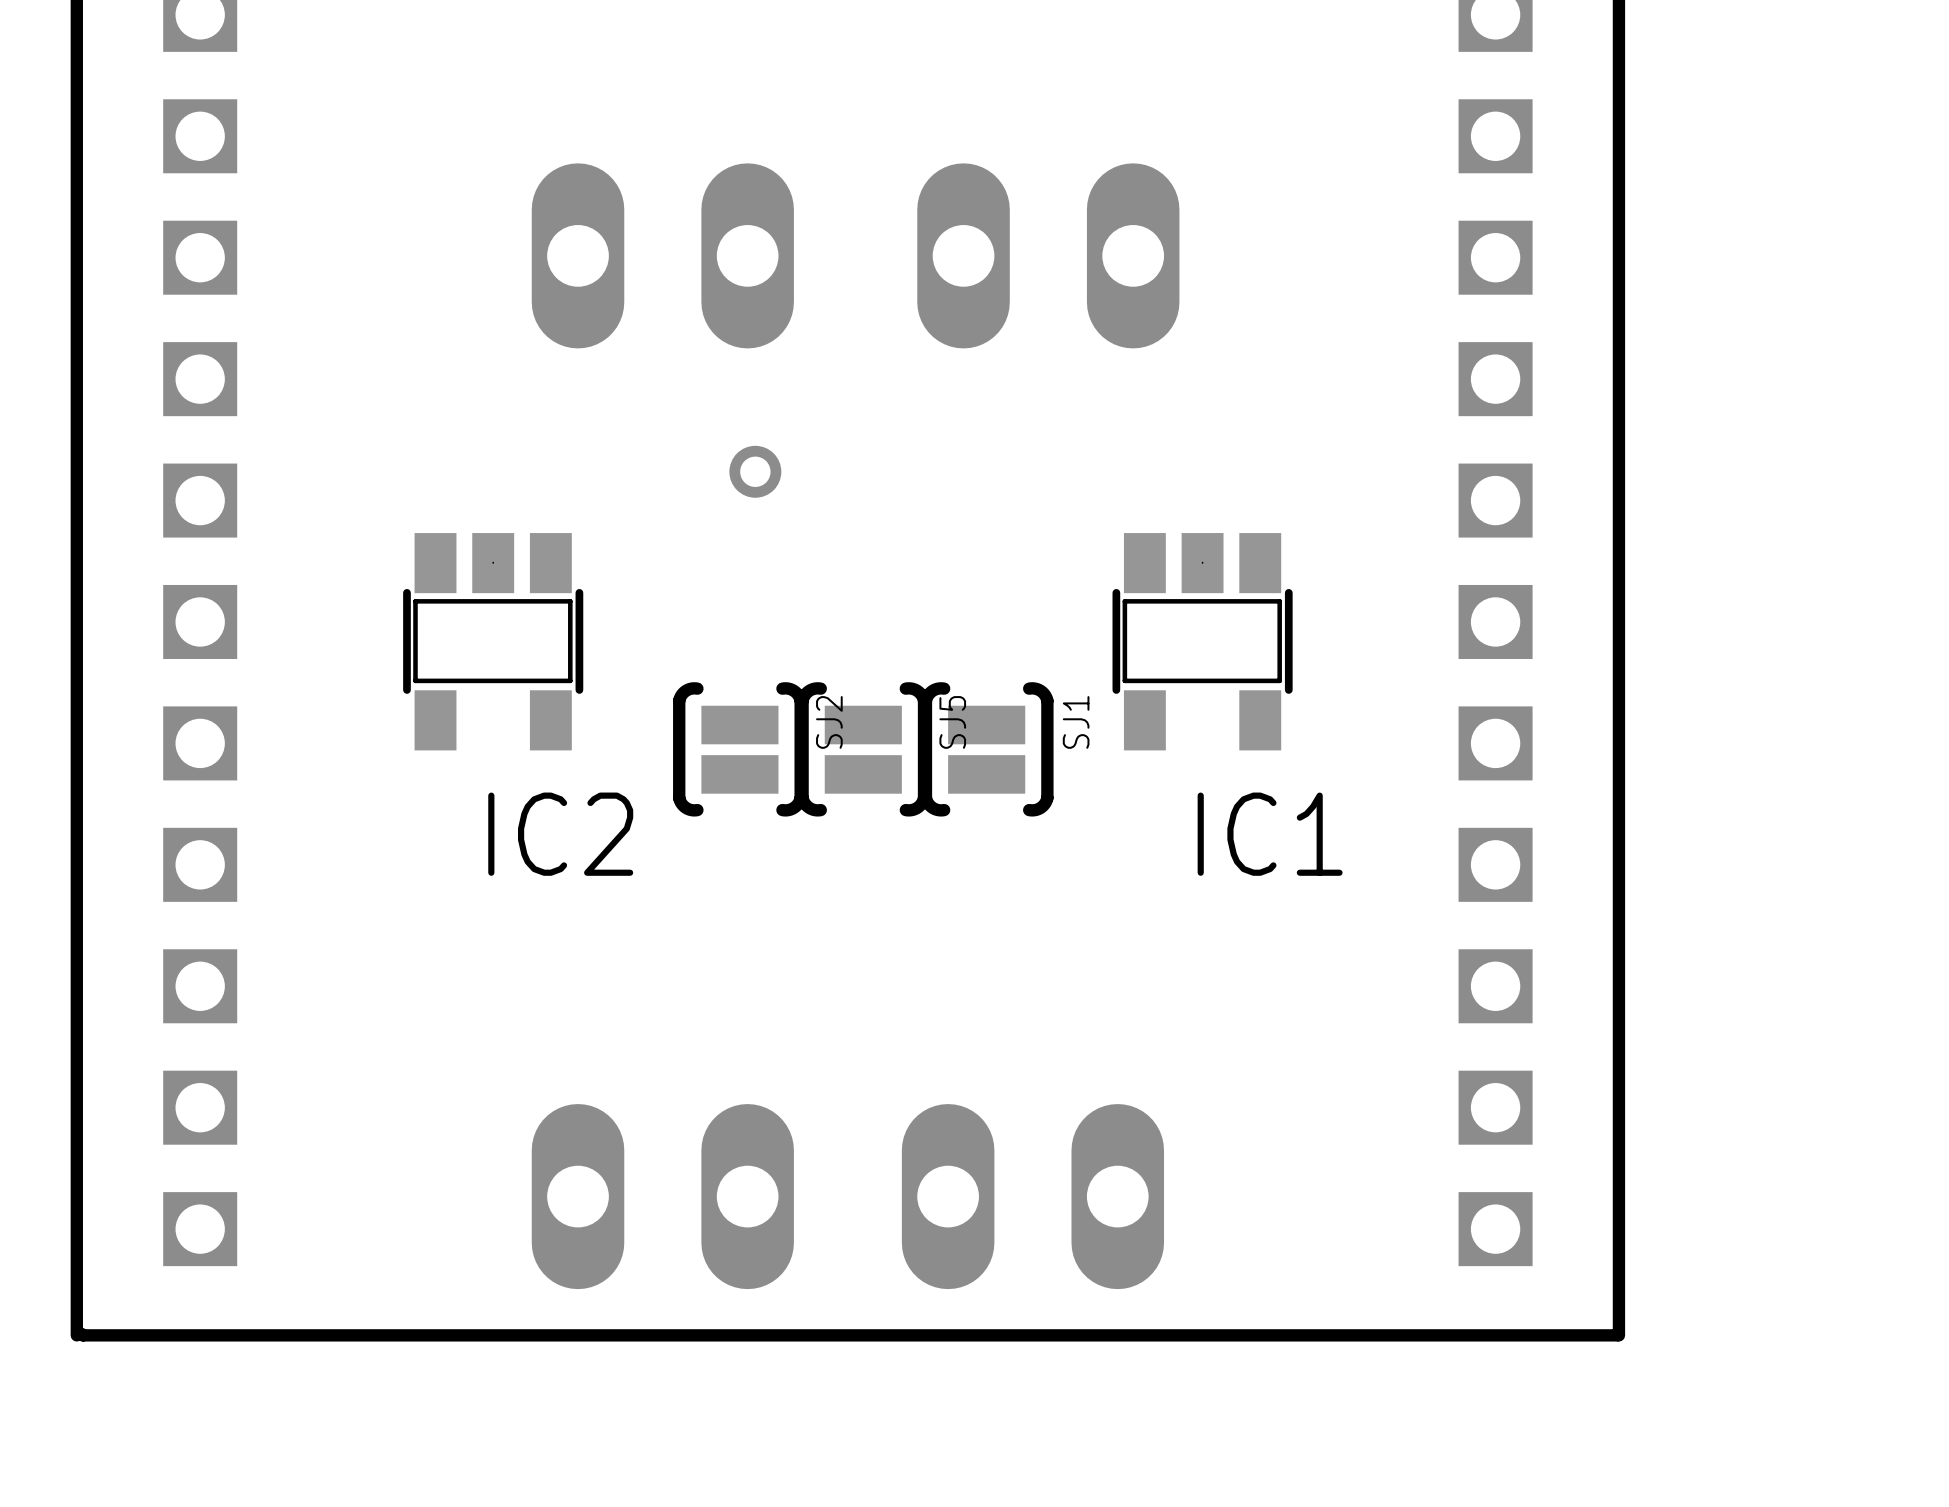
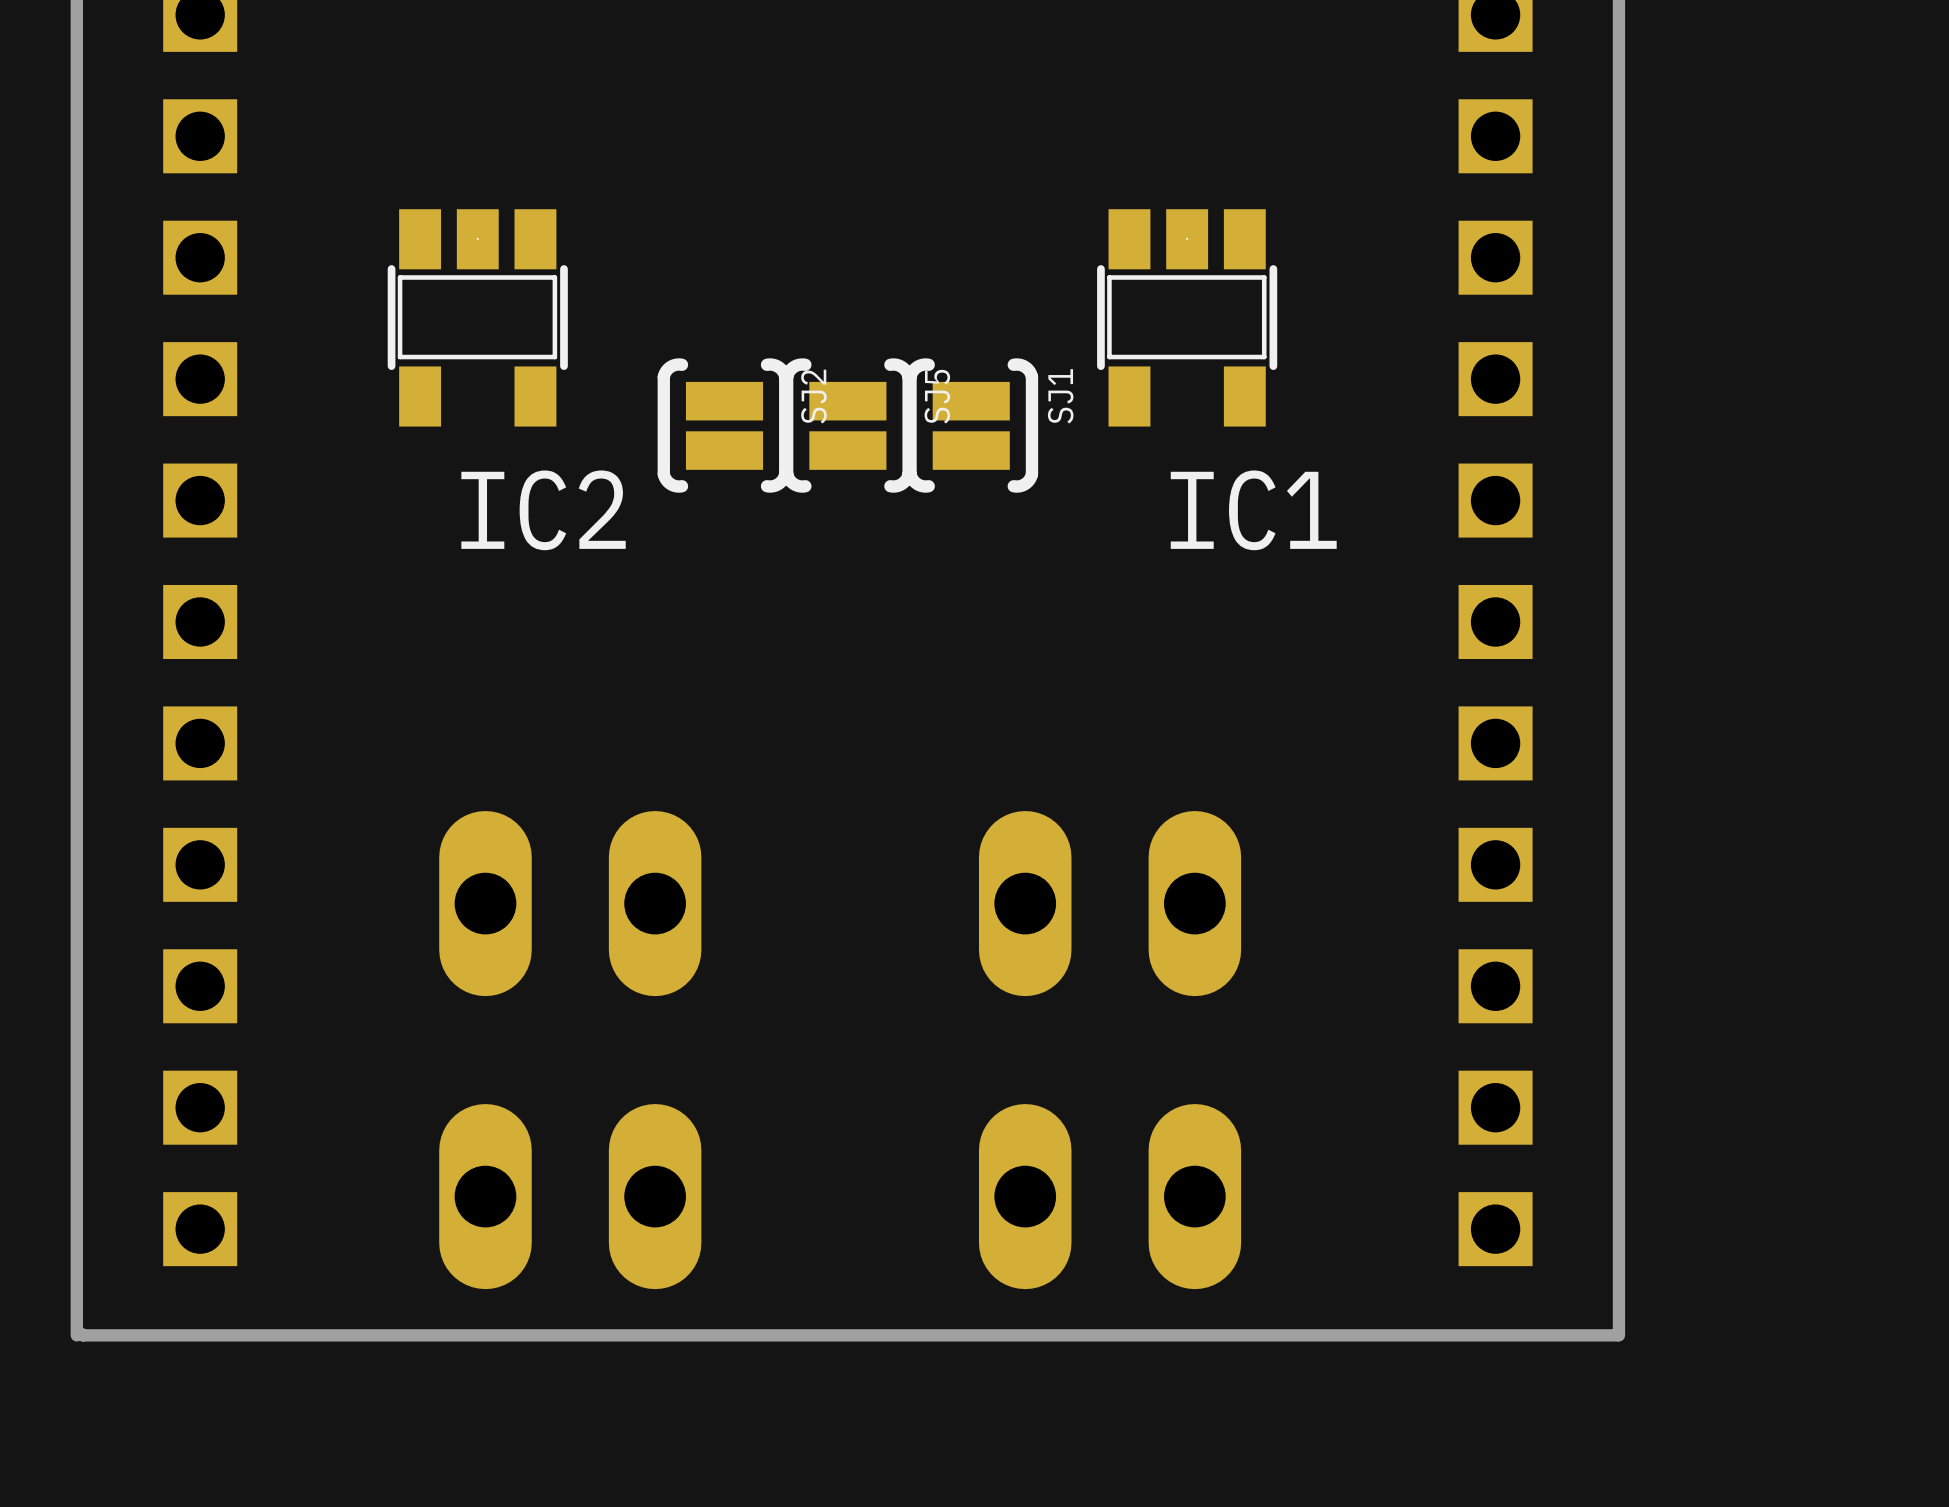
part: (662, 255) -> none
part: (1048, 255) -> none
via: (755, 471) -> none
IC2 position: (493, 641) -> (477, 317)
IC1 position: (1202, 641) -> (1187, 317)
SJ2 position: (739, 749) -> (724, 425)
SJ5 position: (863, 749) -> (847, 425)
SJ1 position: (986, 749) -> (971, 425)
part: none -> (570, 903)
part: none -> (1110, 903)
part position: (662, 1196) -> (570, 1196)
part position: (1032, 1196) -> (1110, 1196)

